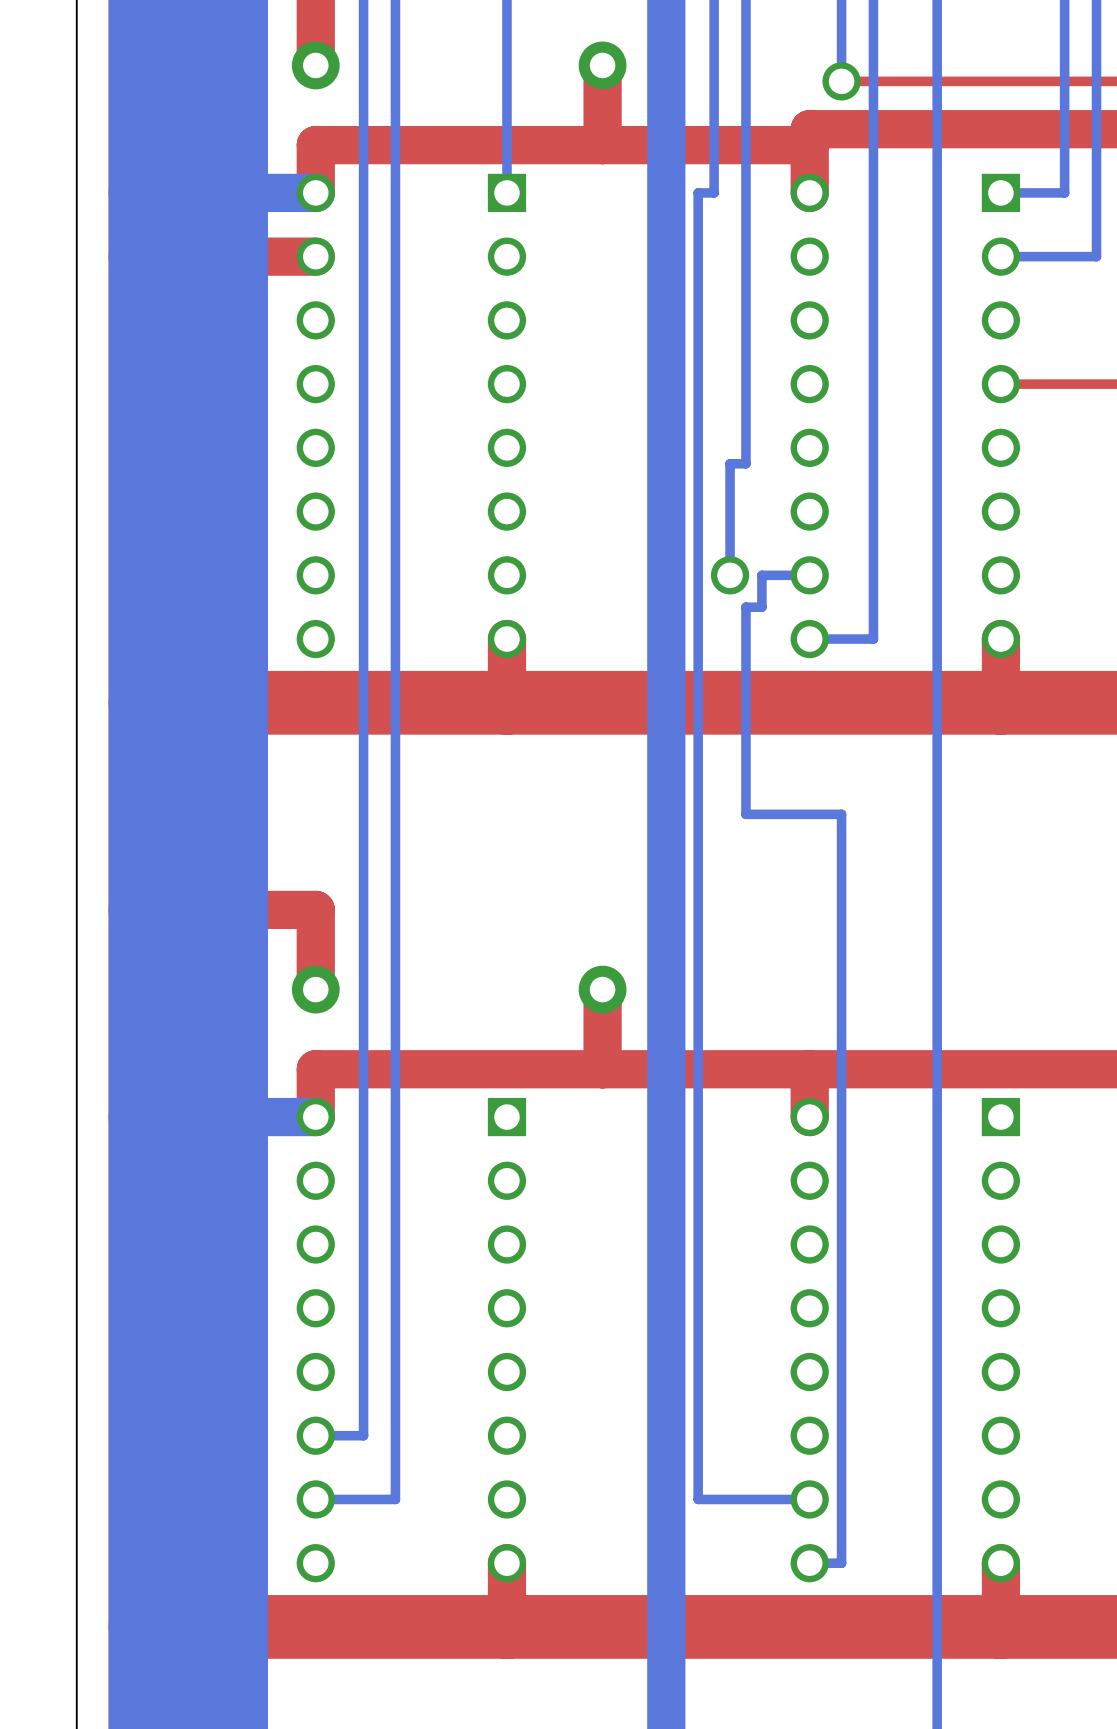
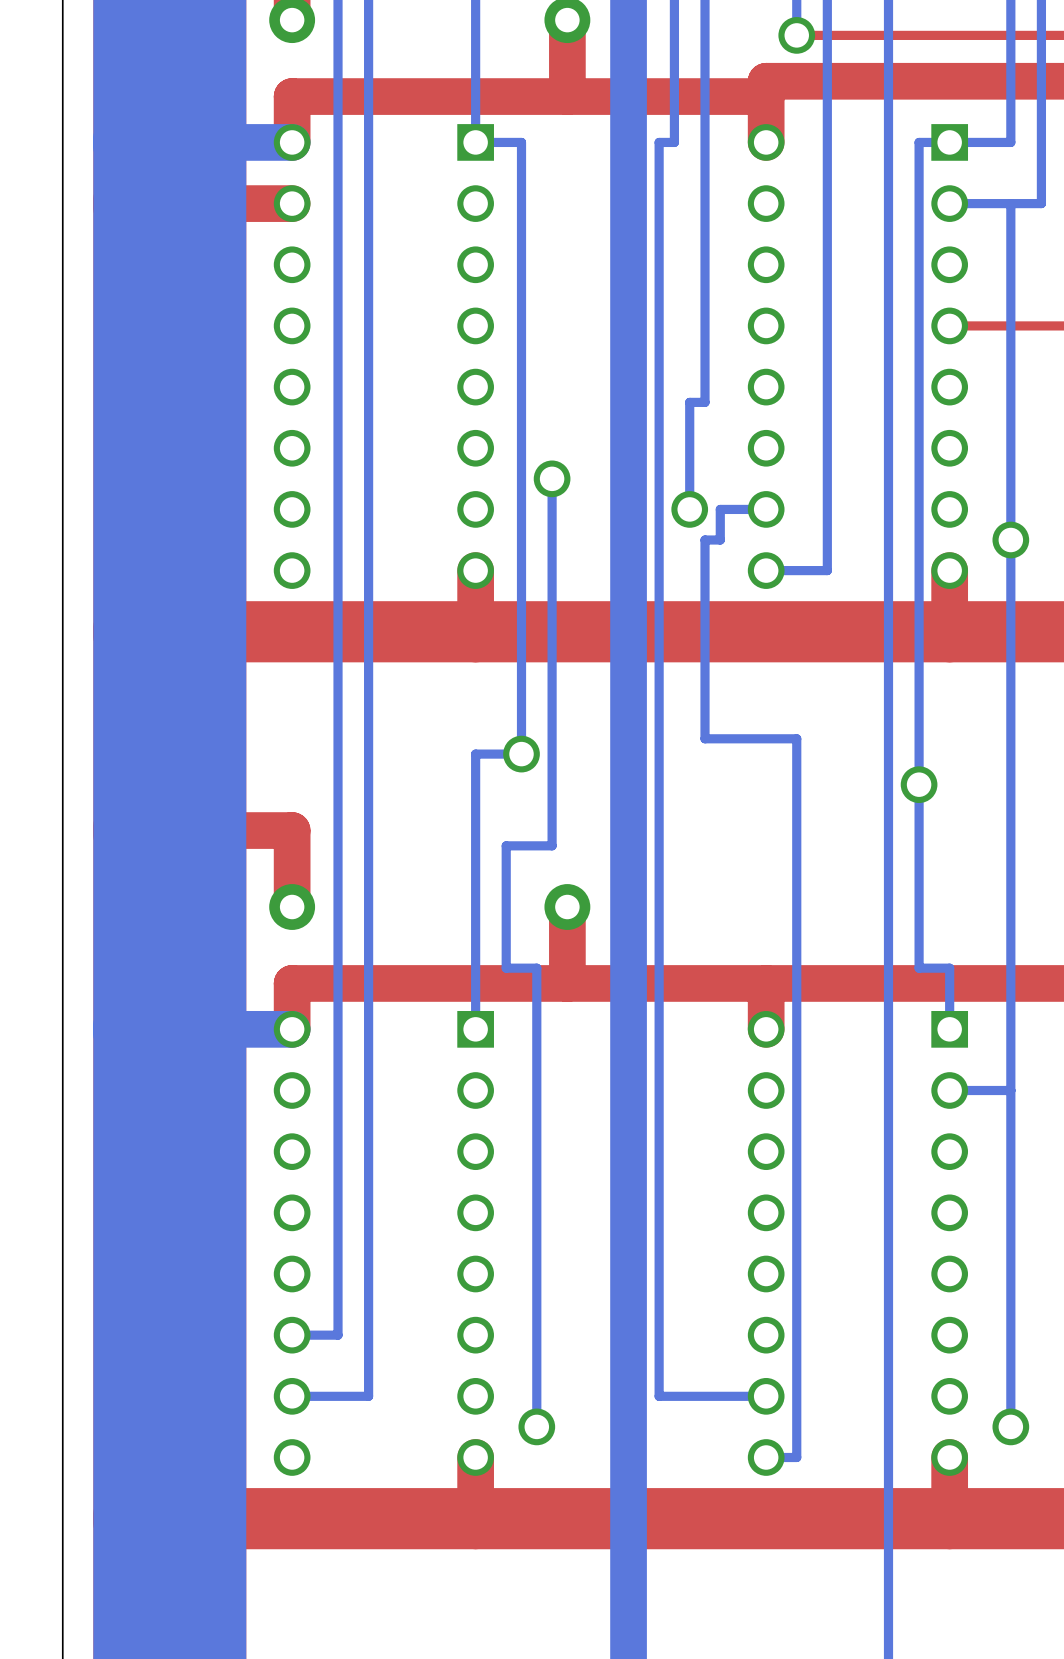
bottom track: none -> (475, 142) (521, 142) (521, 754) (475, 754) (475, 1029)
bottom track: none -> (949, 142) (919, 142) (919, 968) (949, 968) (949, 1029)
bottom track: none -> (1010, 203) (1010, 1426)
bottom track: none -> (552, 478) (552, 845) (506, 845) (506, 968) (536, 968) (536, 1426)
via: none -> (552, 478)
via: none -> (1010, 540)
via: none -> (521, 754)
via: none -> (919, 784)
bottom track: none -> (1010, 1090) (949, 1090)
via: none -> (536, 1426)
via: none -> (1010, 1426)

